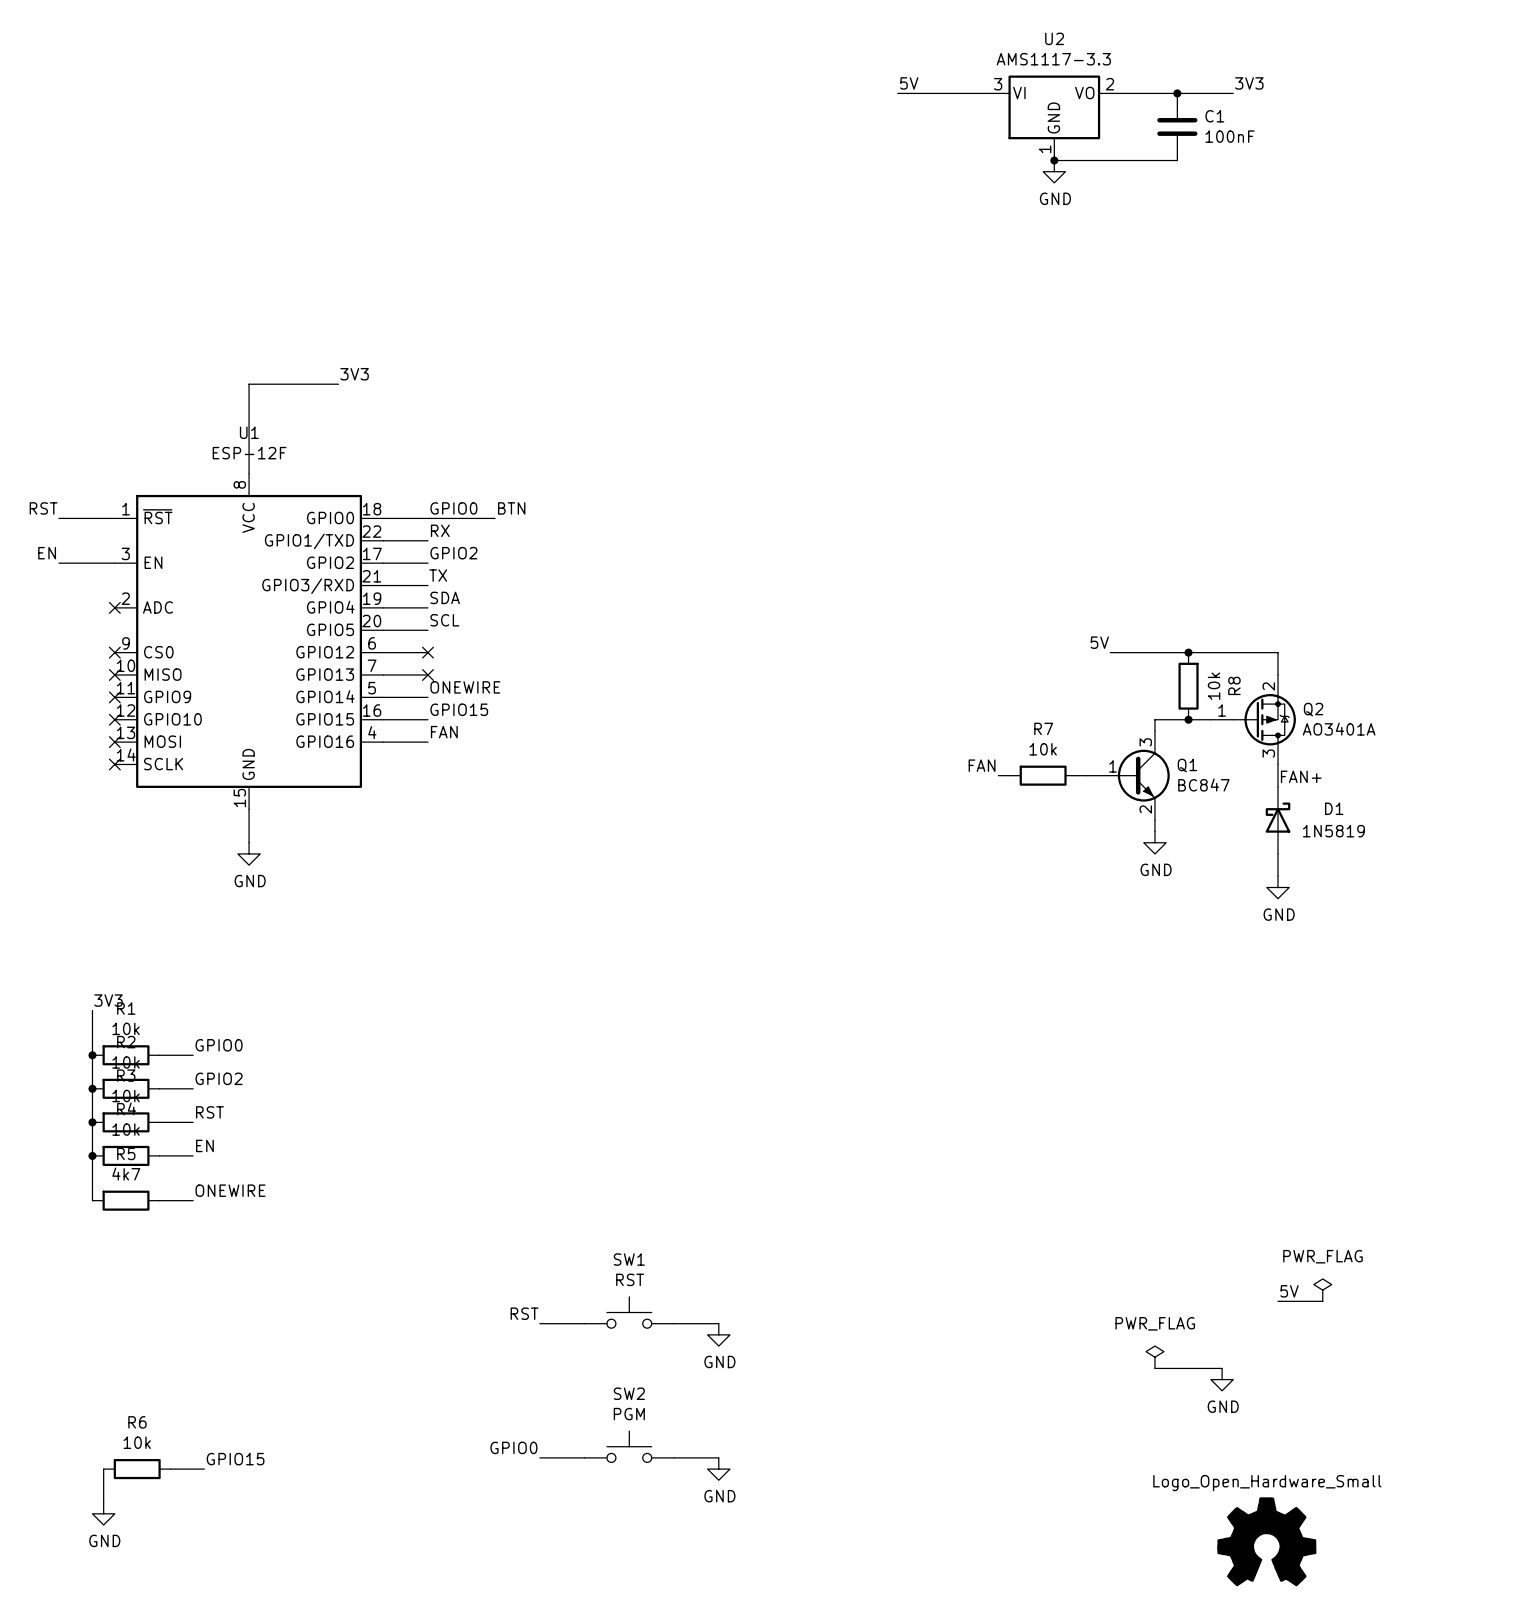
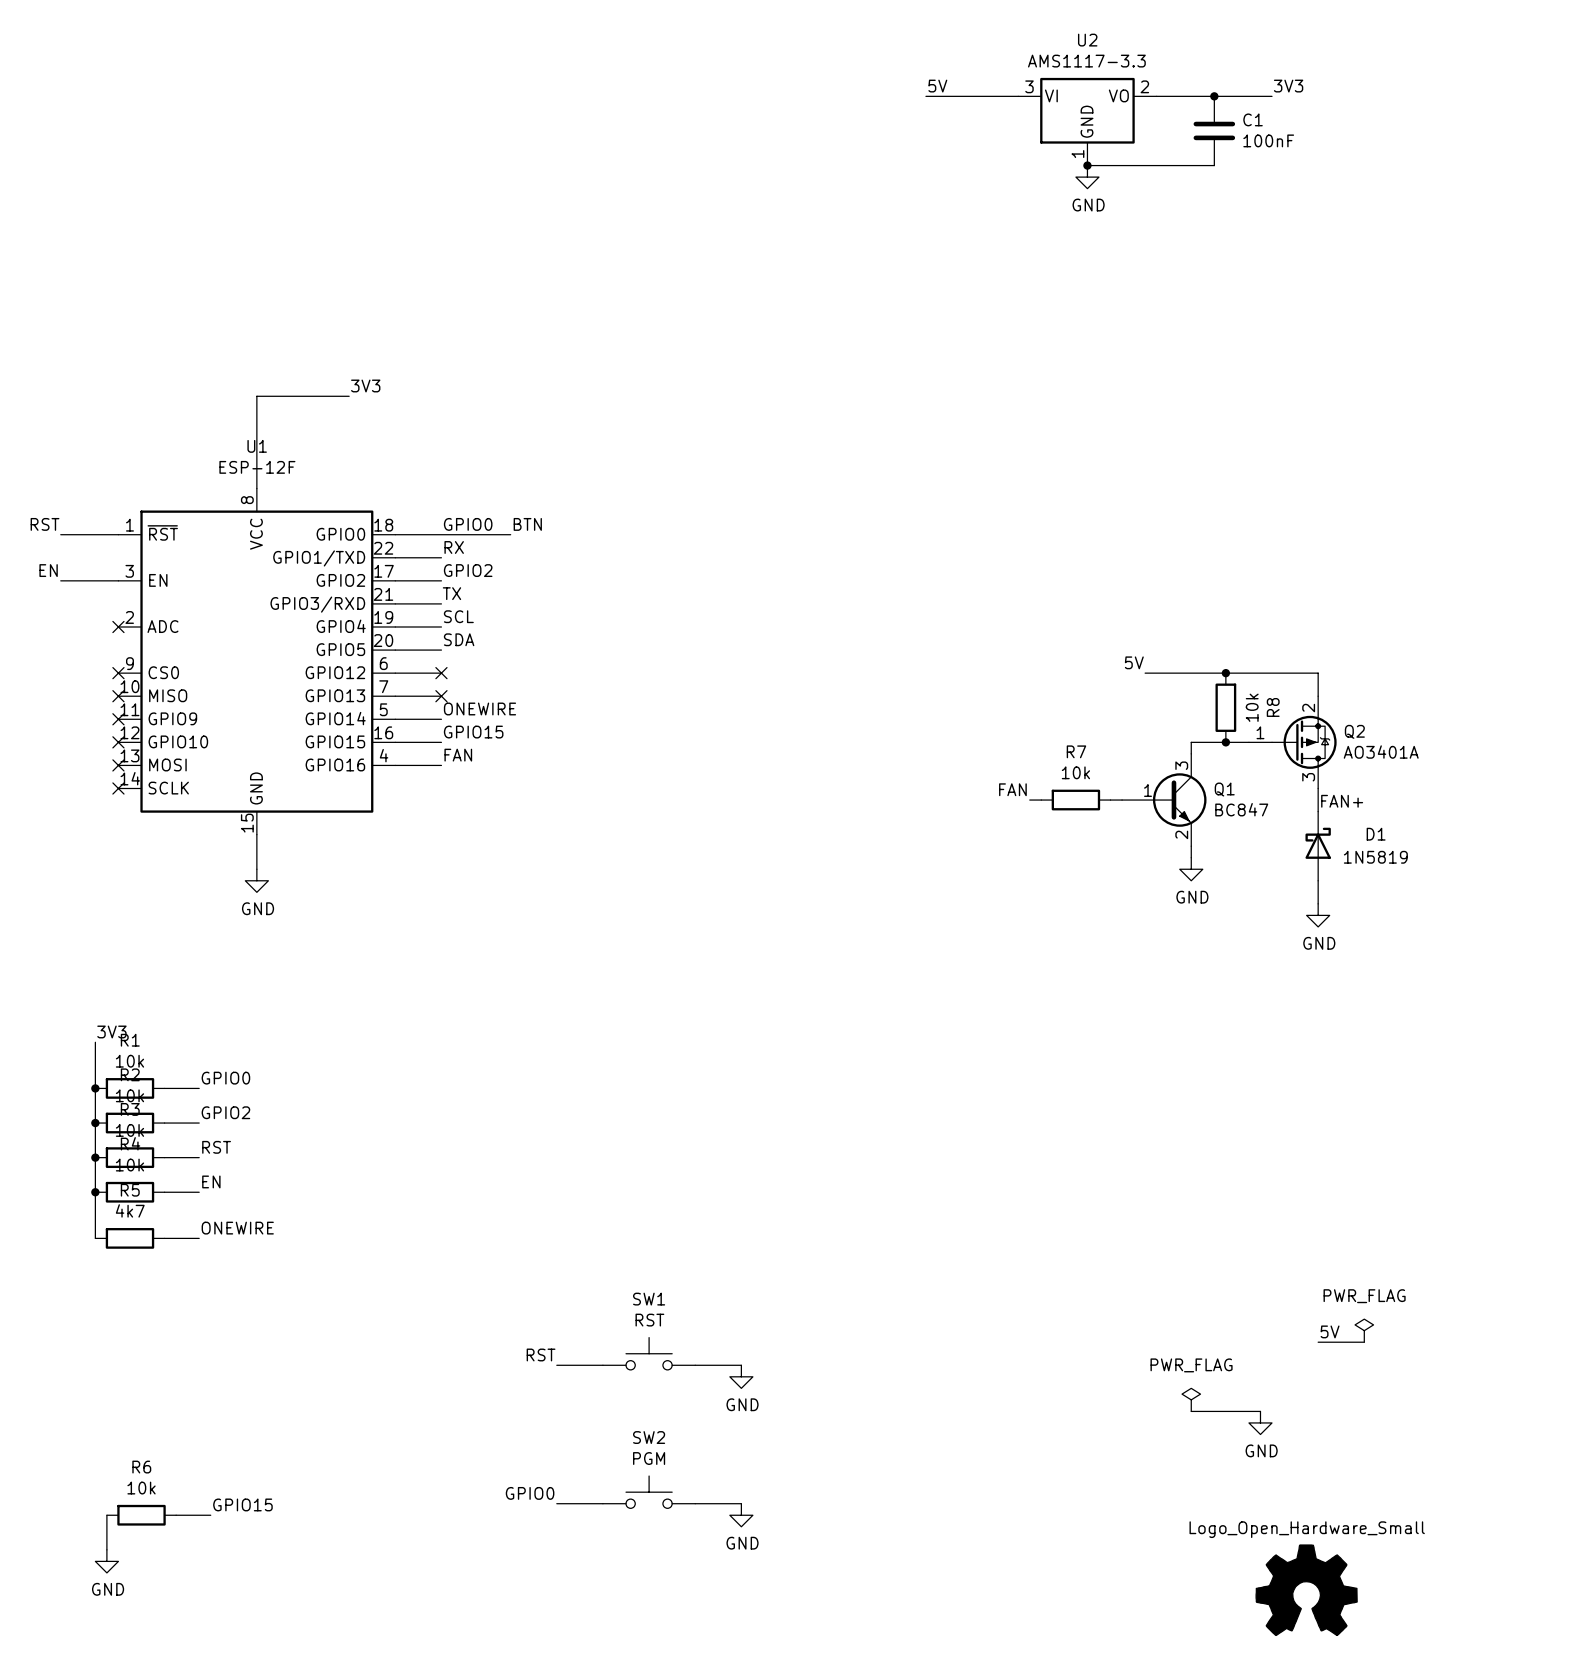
label: SDA (445, 597) -> SCL (458, 616)
label: SCL (444, 620) -> SDA (459, 639)

